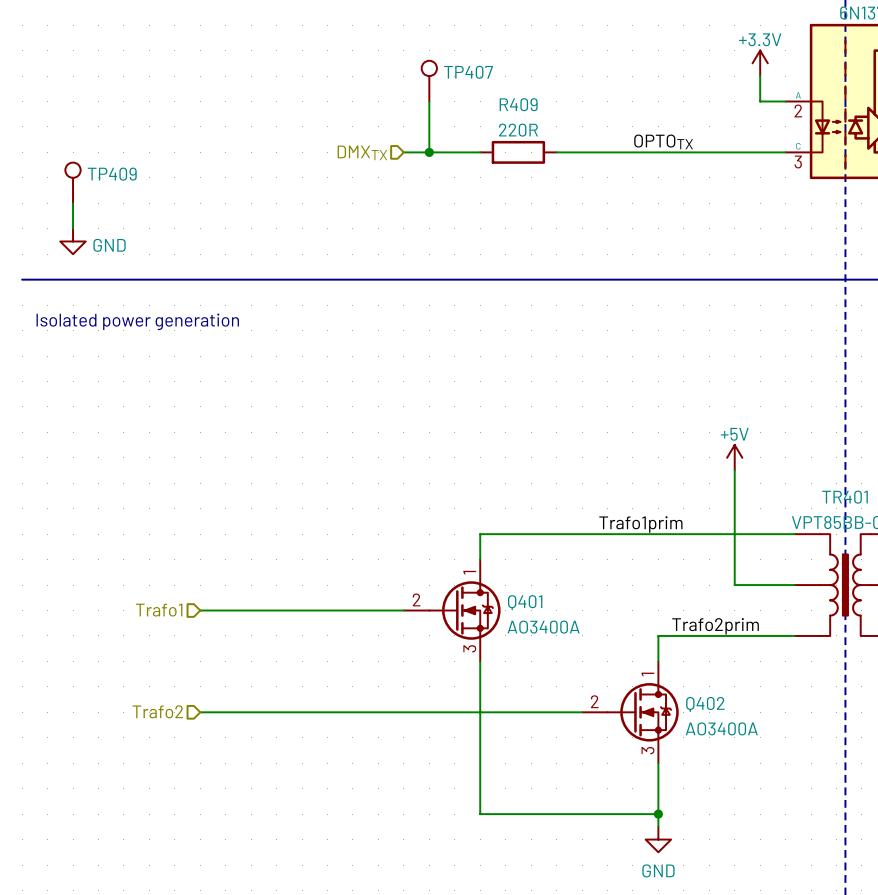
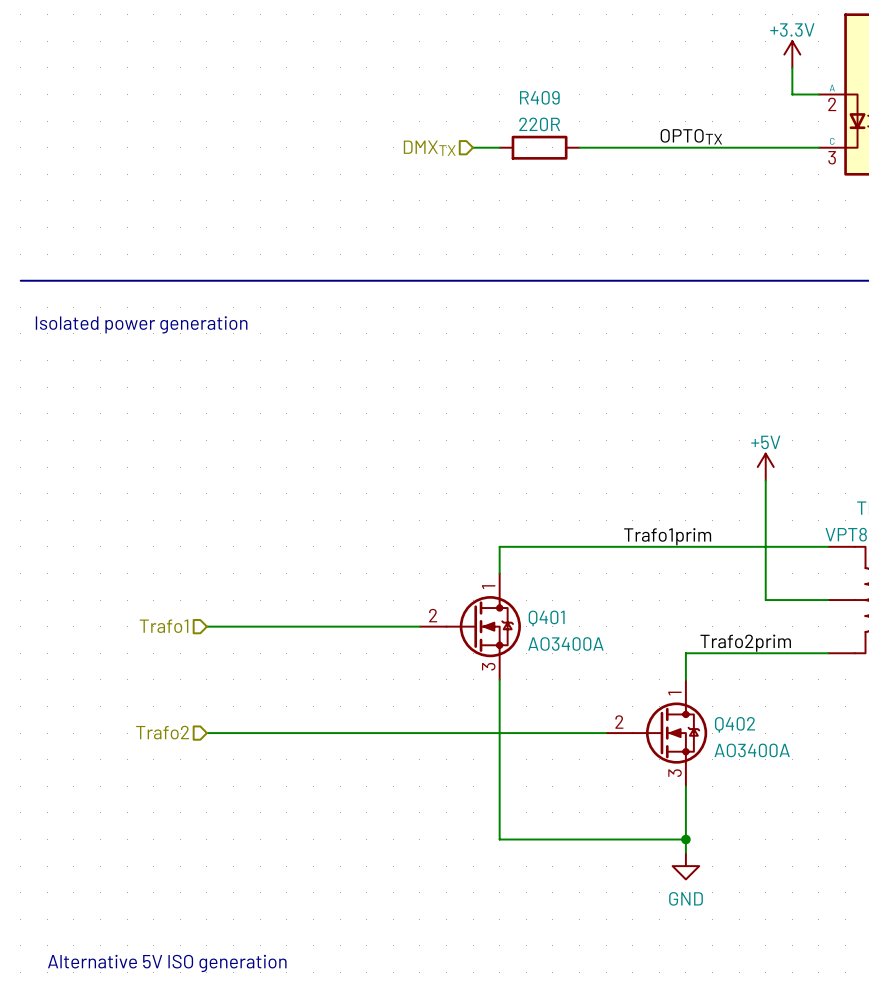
TP407: (429, 81) -> none
wire: (429, 101) (429, 152) -> none
hierarchical label position: DMXTX (362, 152) -> DMXTX (429, 148)
wire: (403, 152) (454, 152) -> none
junction: (429, 152) -> none
TP409: (73, 182) -> none
wire: (73, 203) (73, 228) -> none
power symbol: GND (73, 241) -> none

